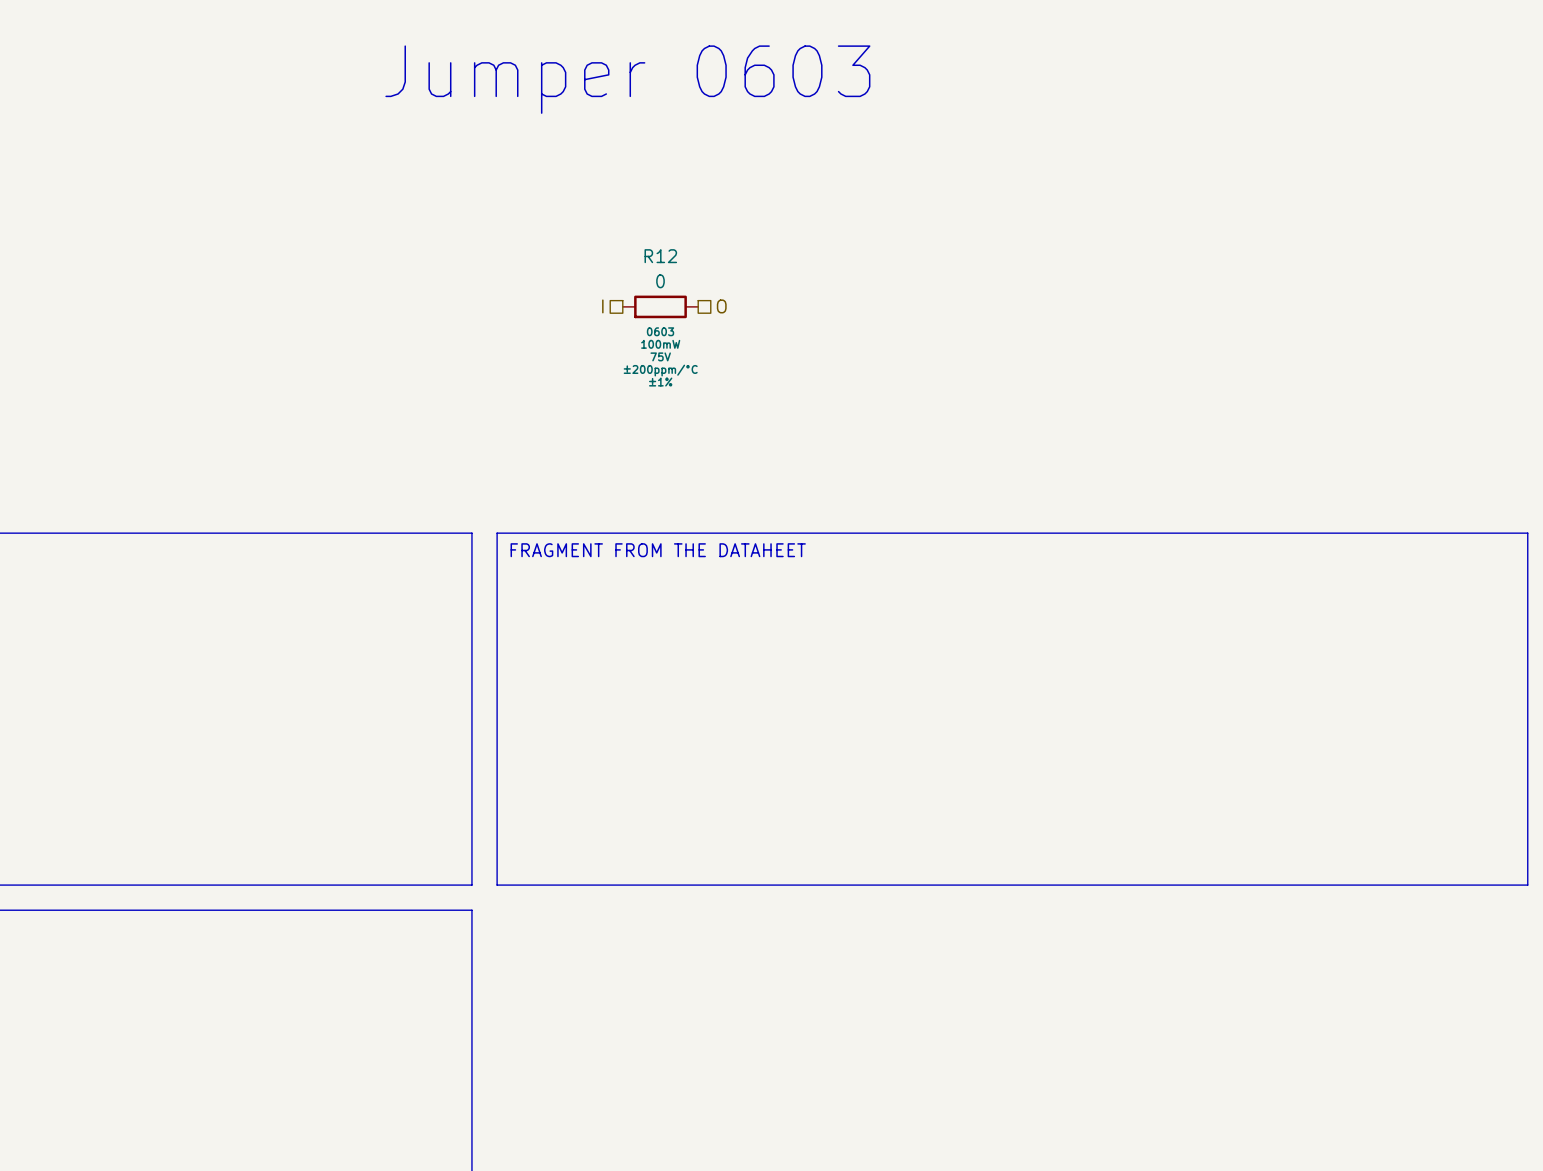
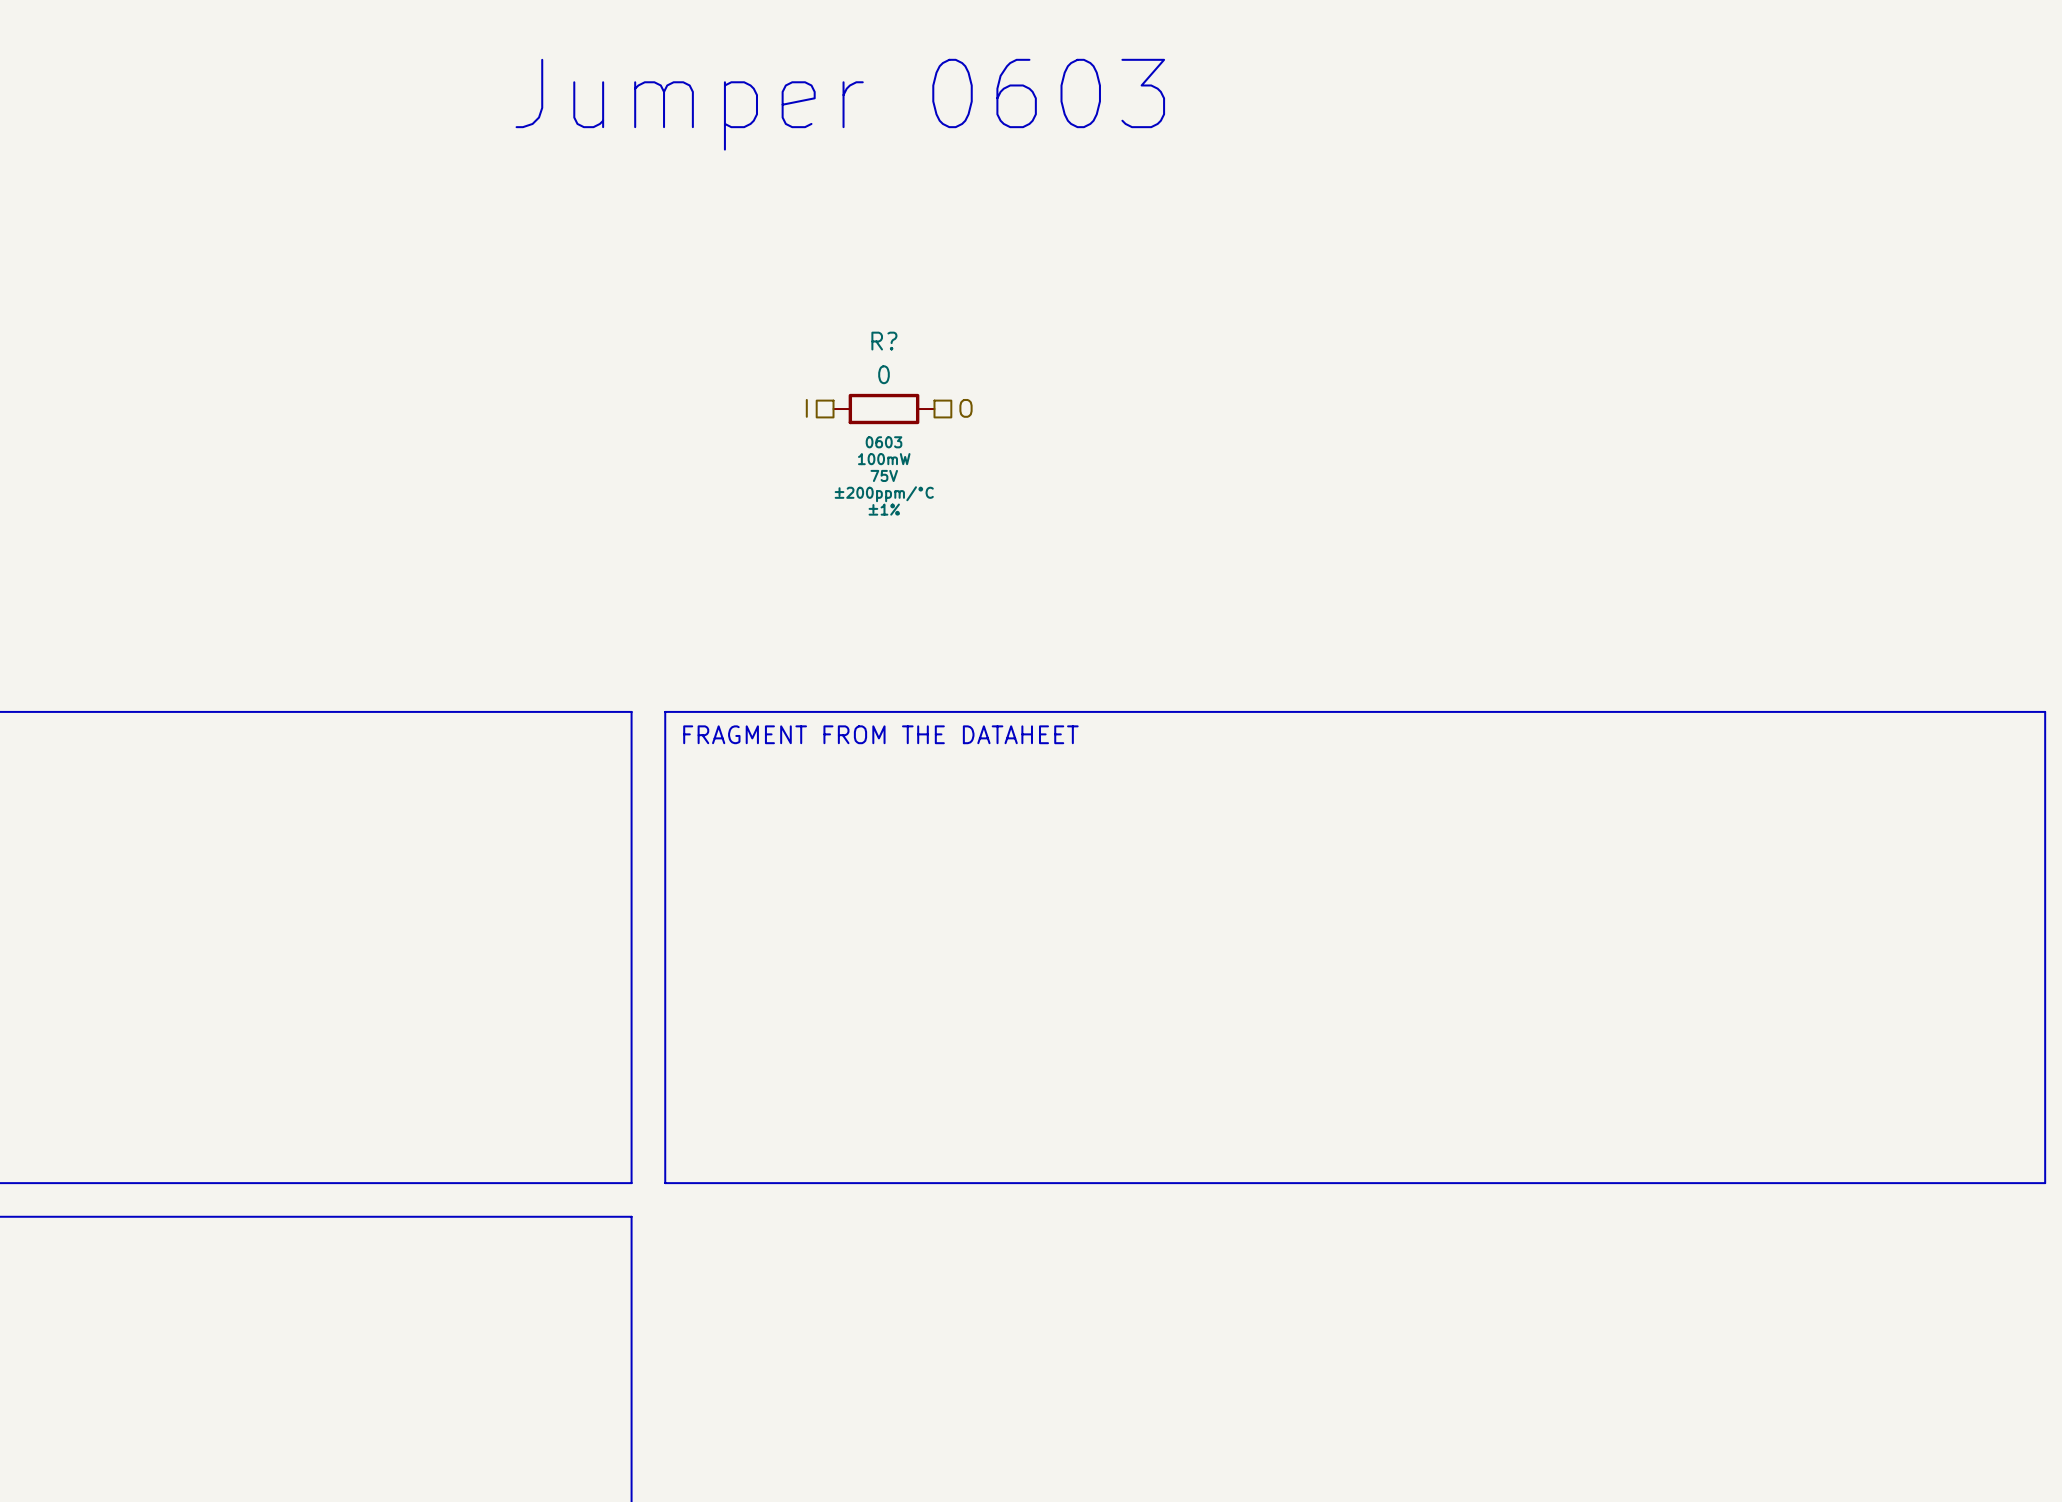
R12 name: R12 (660, 256) -> R? (884, 341)

